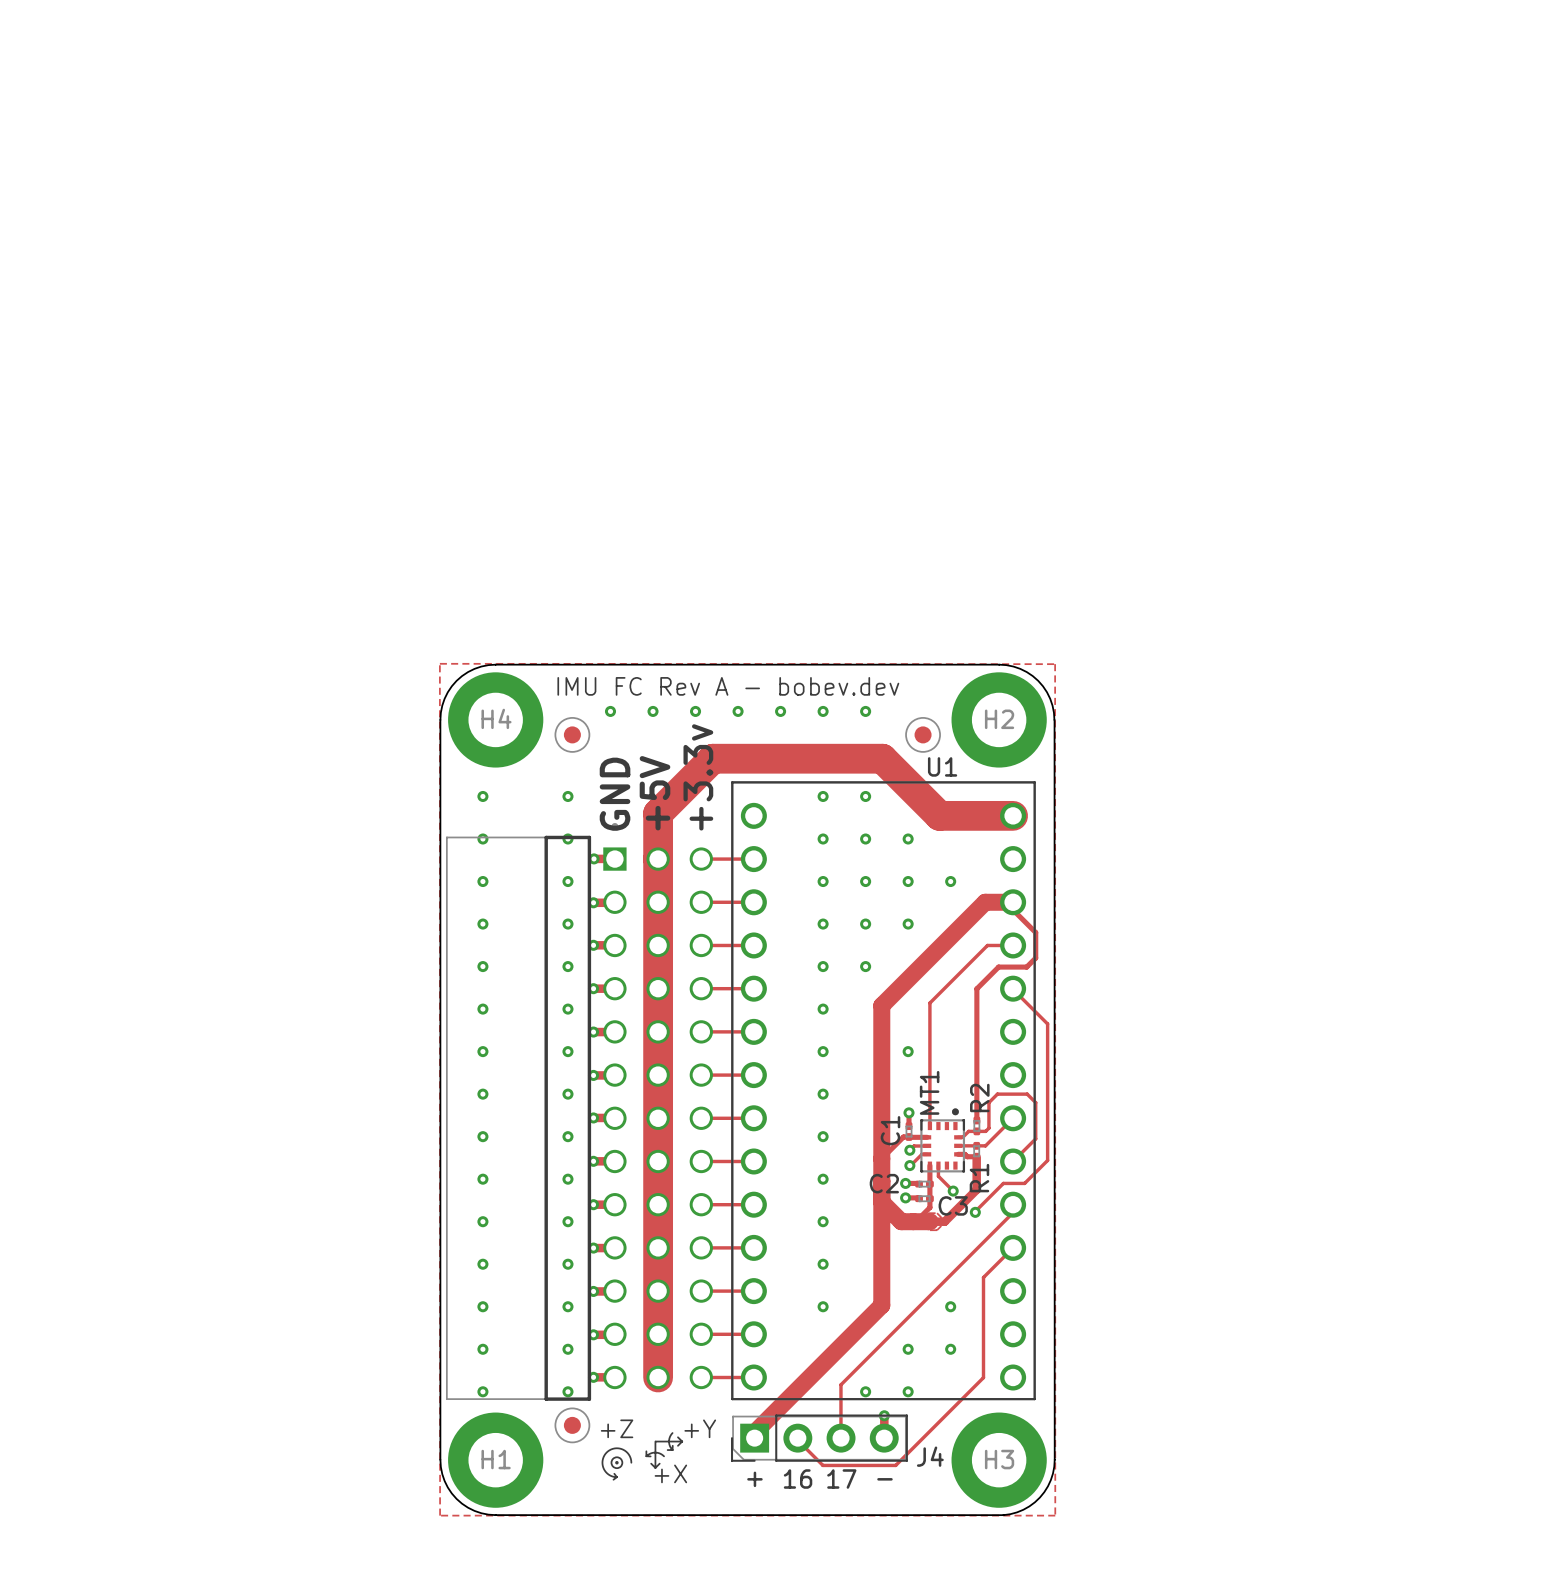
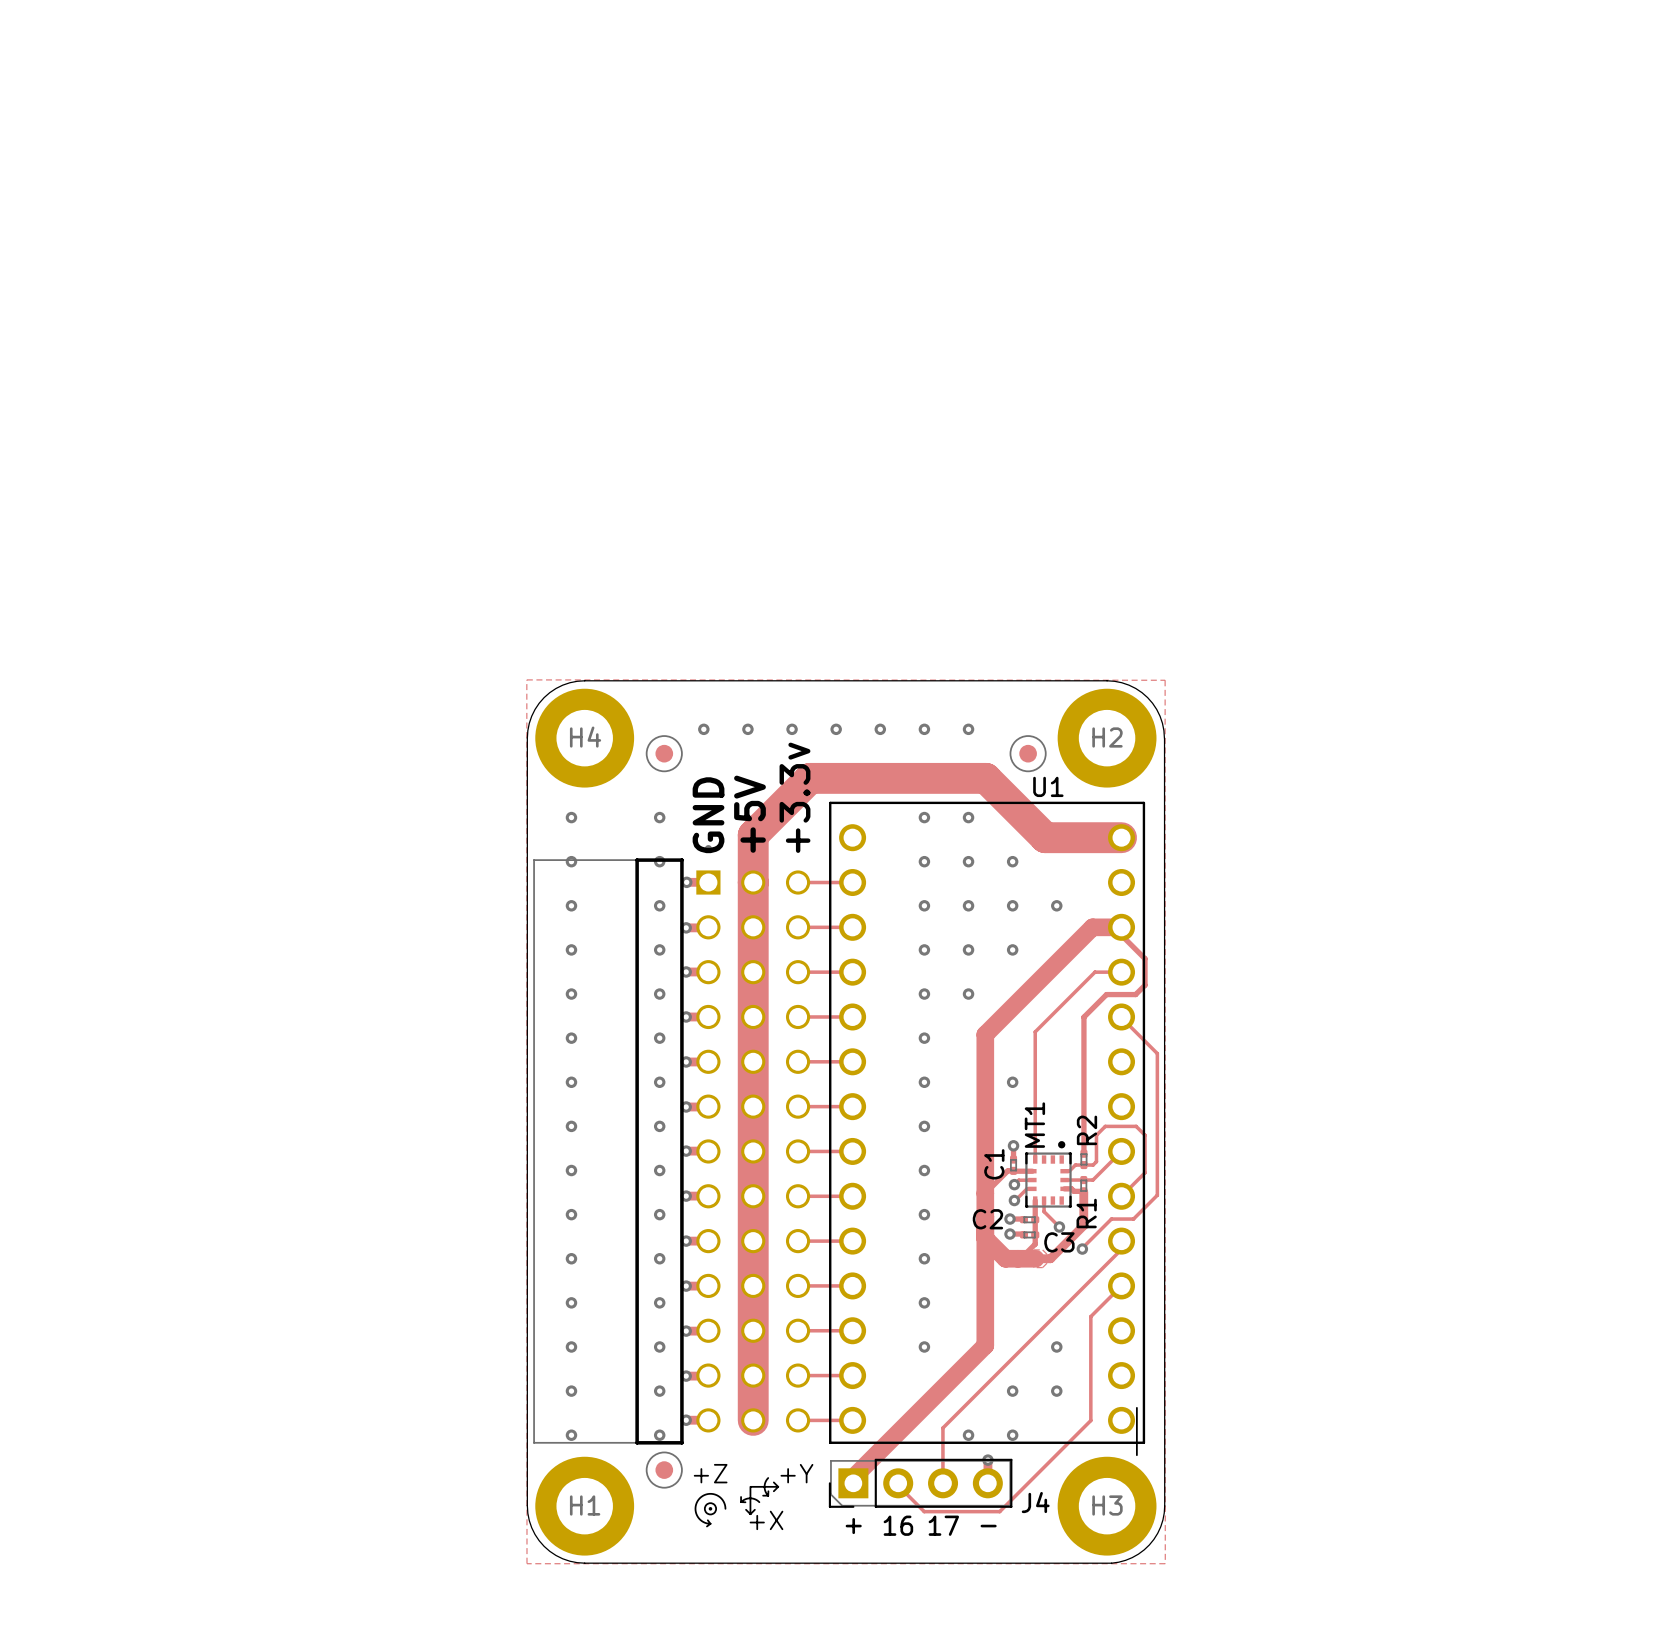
text: IMU FC Rev A - bobev.dev (728, 686) -> none
line: none -> (1136, 1407) (1136, 1455)

